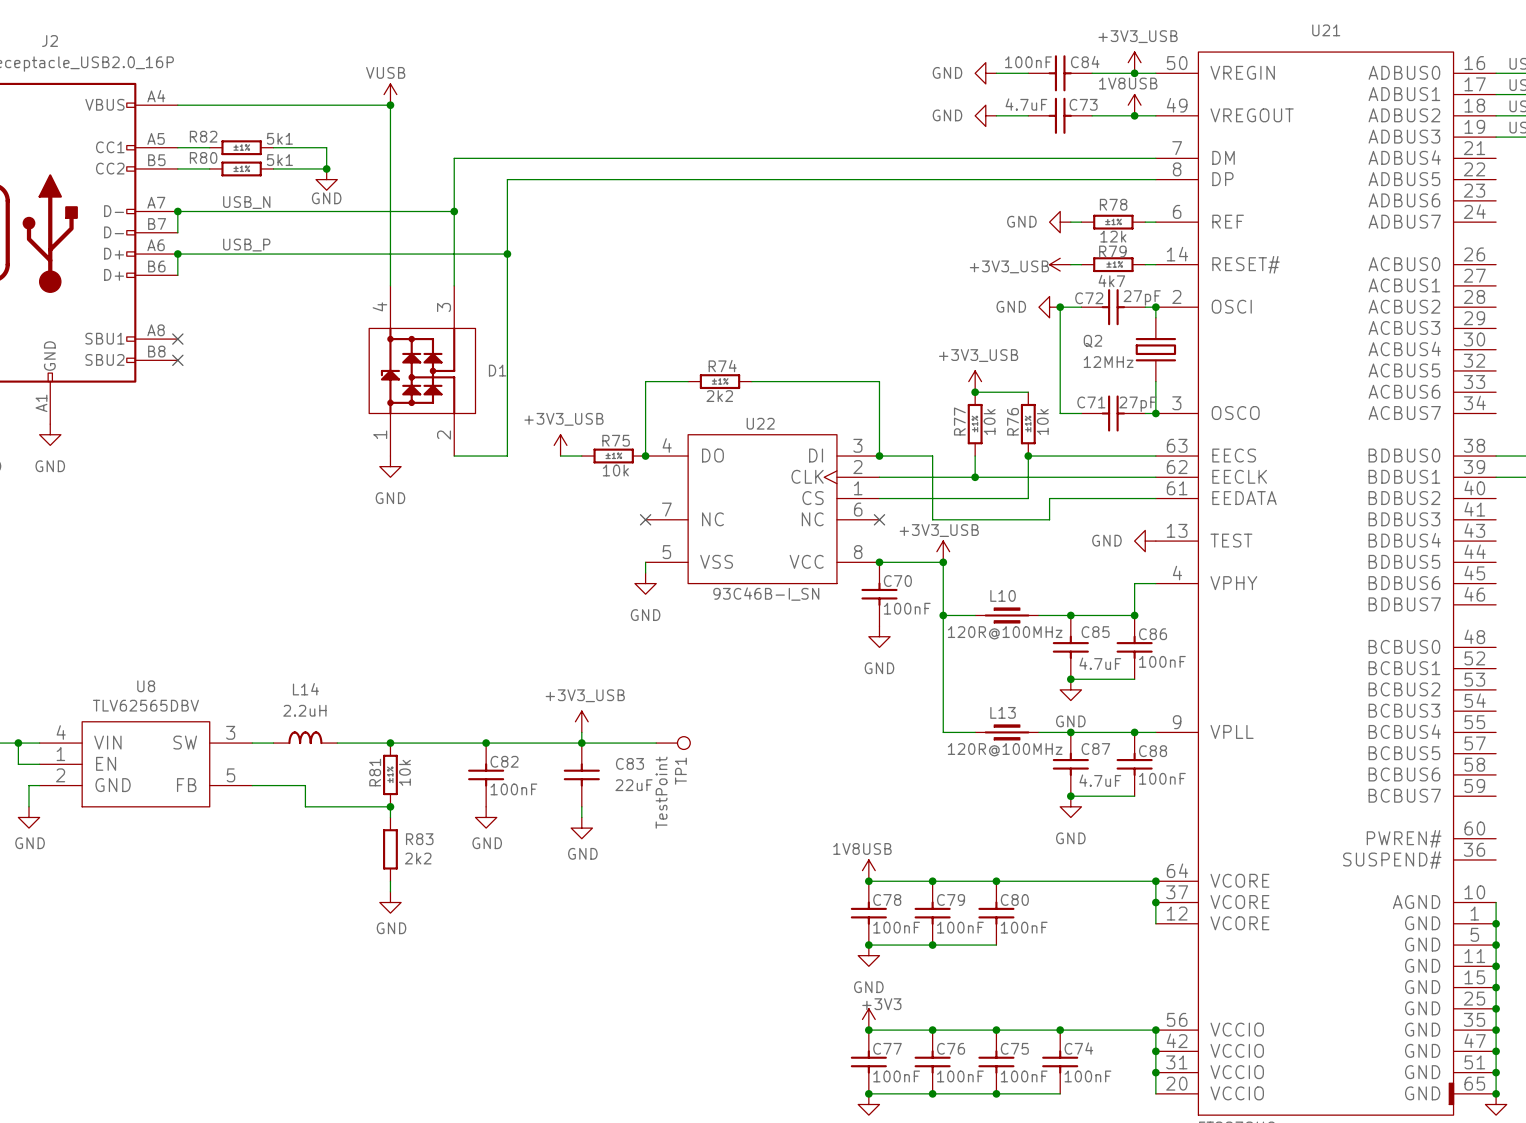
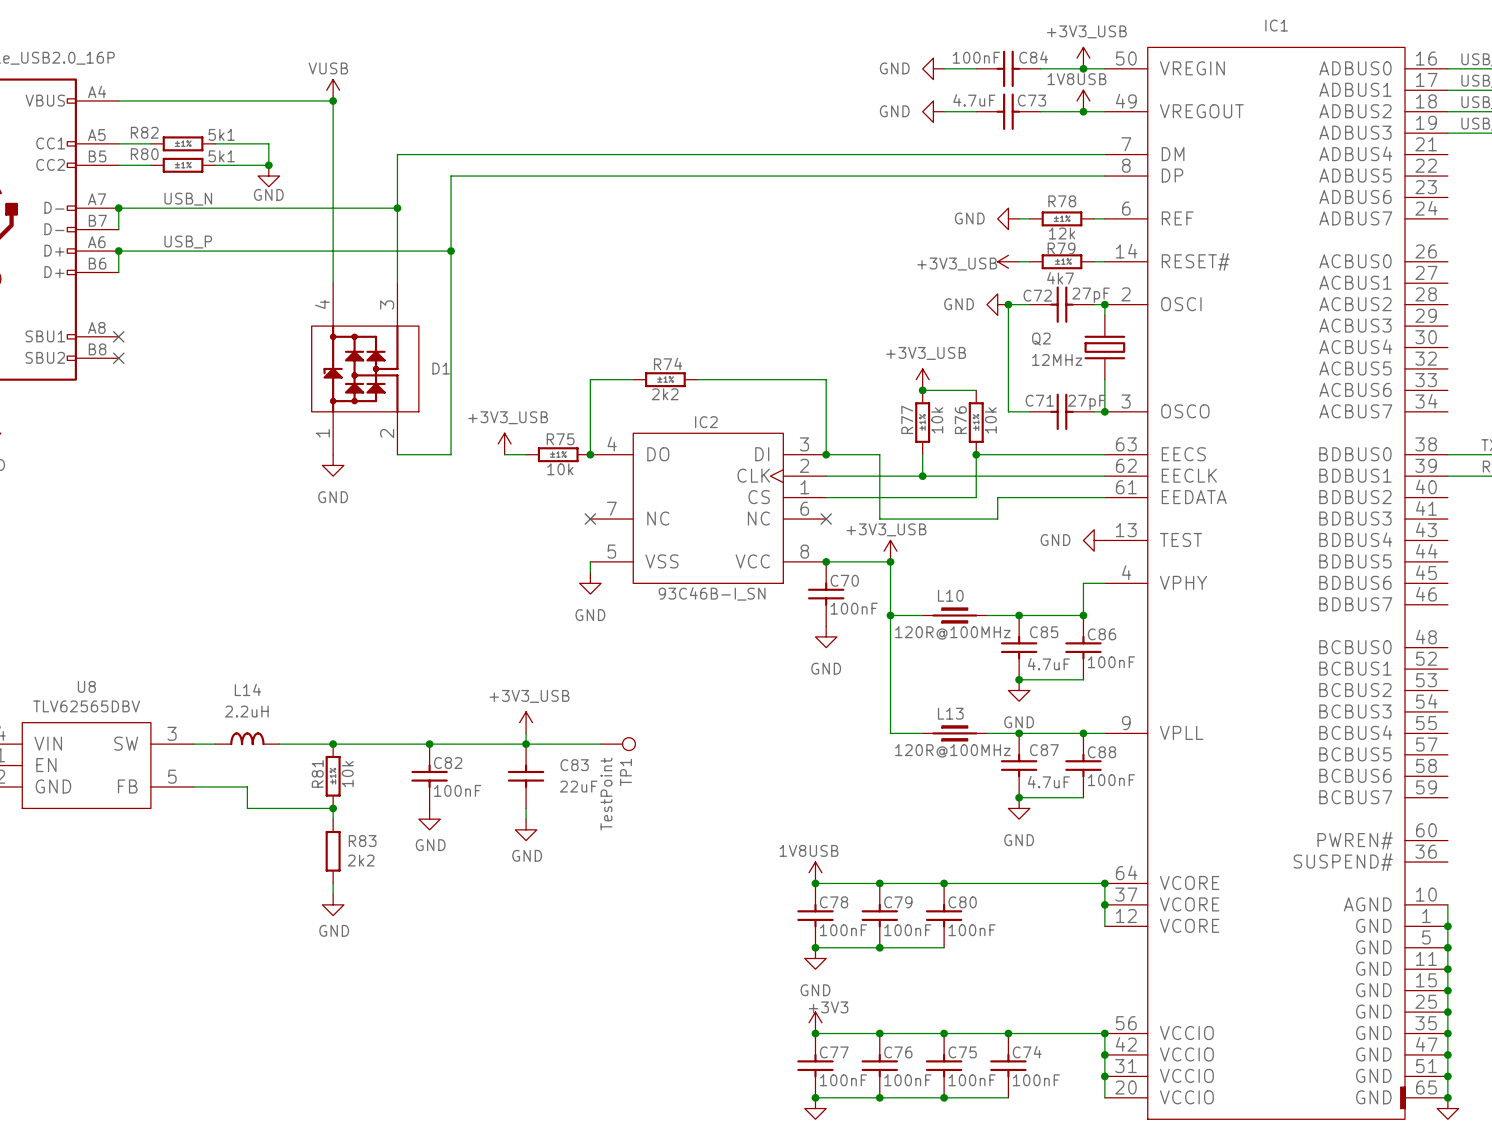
U21 name: U21 (1326, 30) -> IC1 (1276, 25)
U22 name: U22 (760, 423) -> IC2 (706, 422)

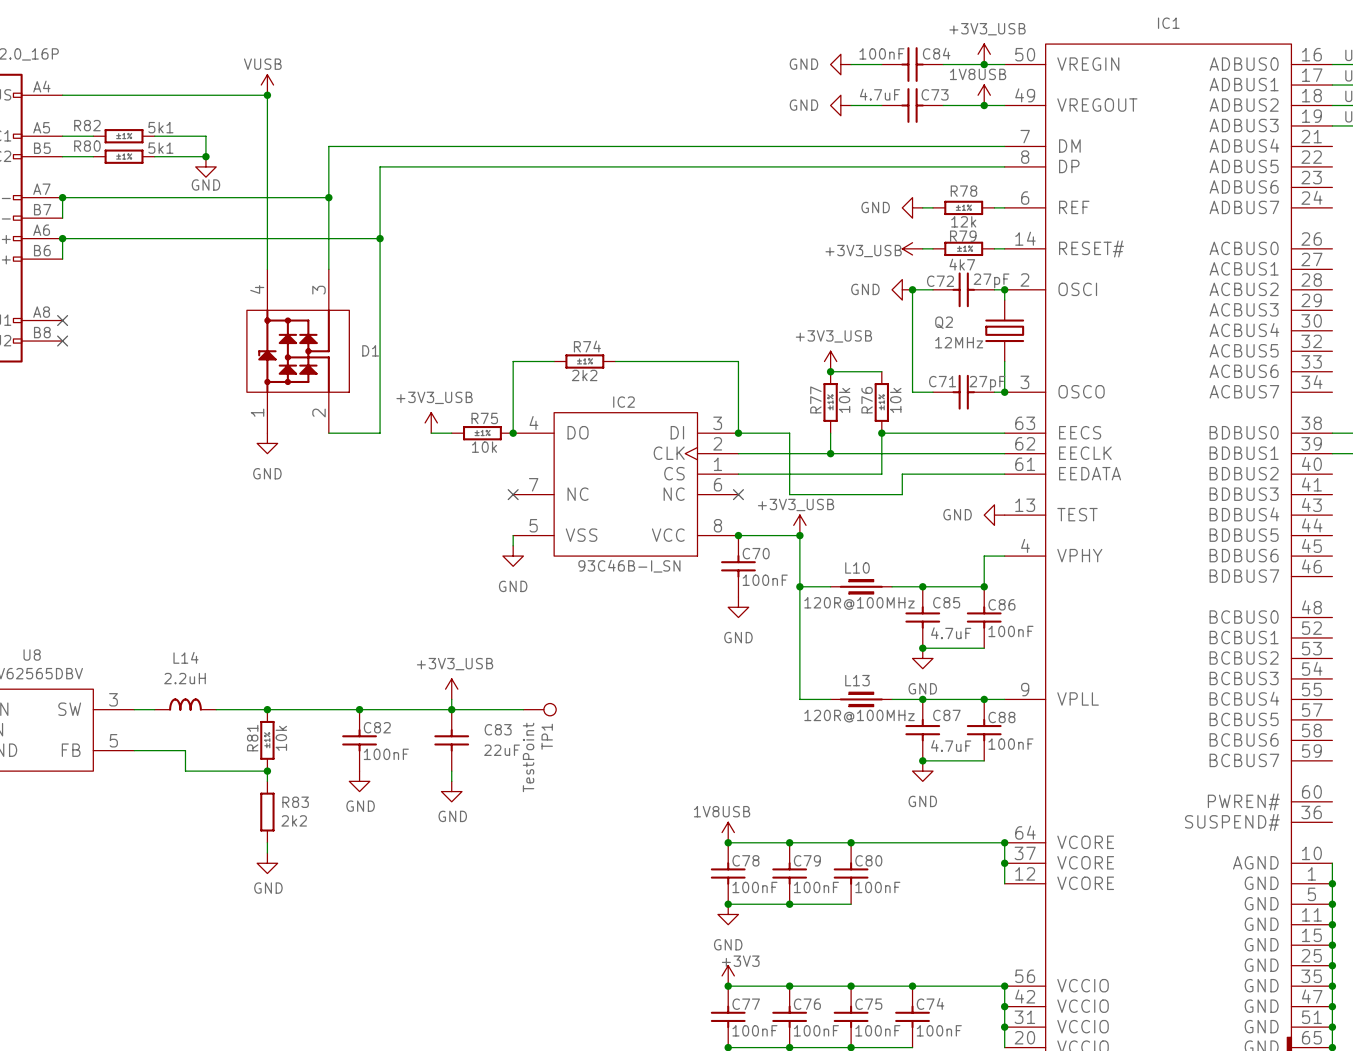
label: USB_N (188, 199) -> none
label: USB_P (188, 242) -> none

